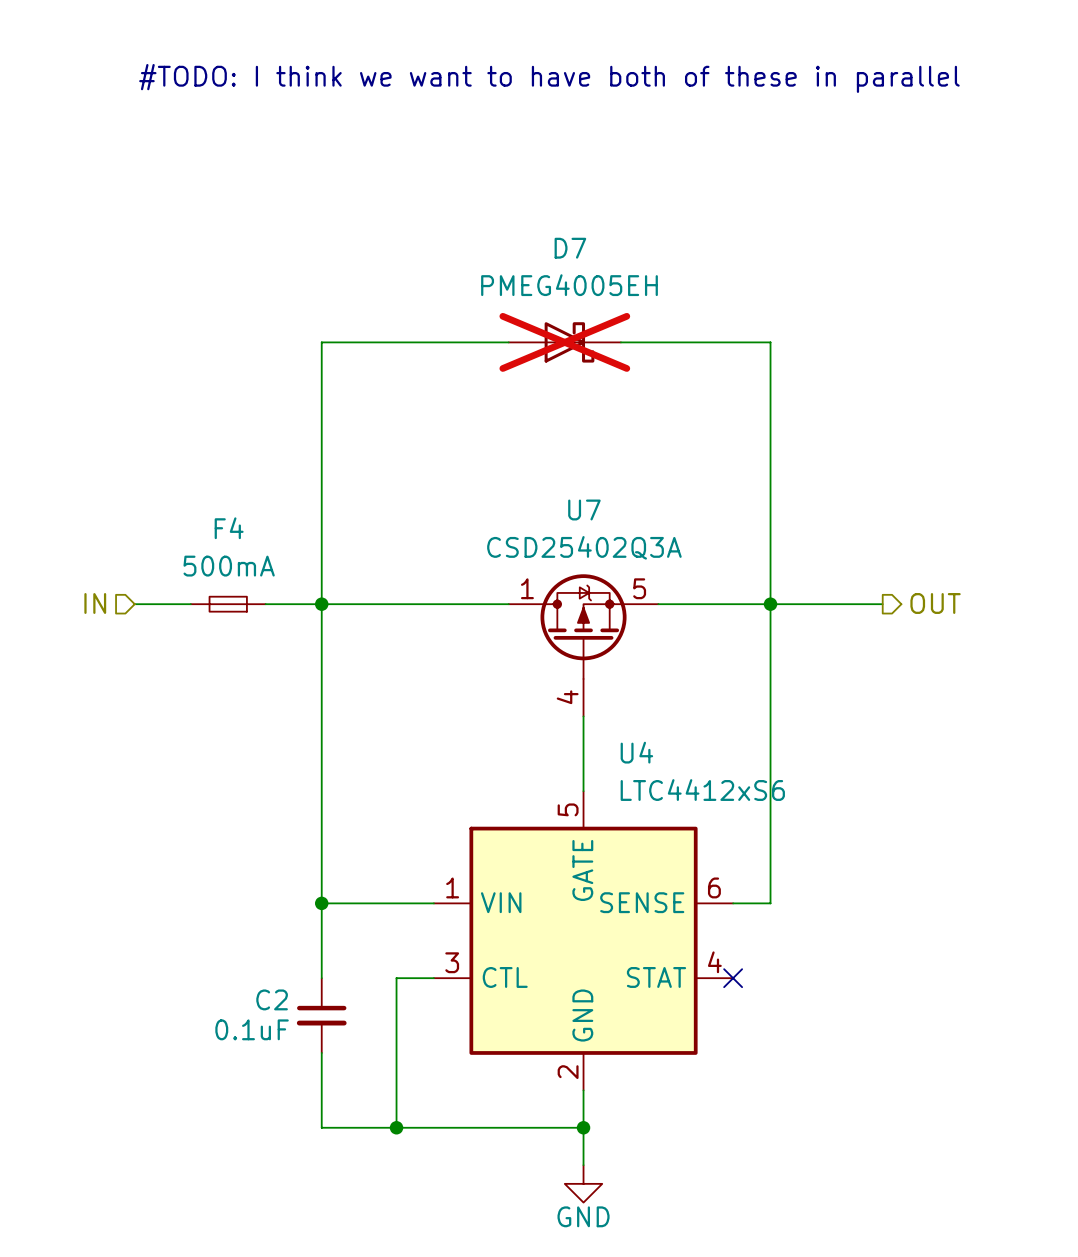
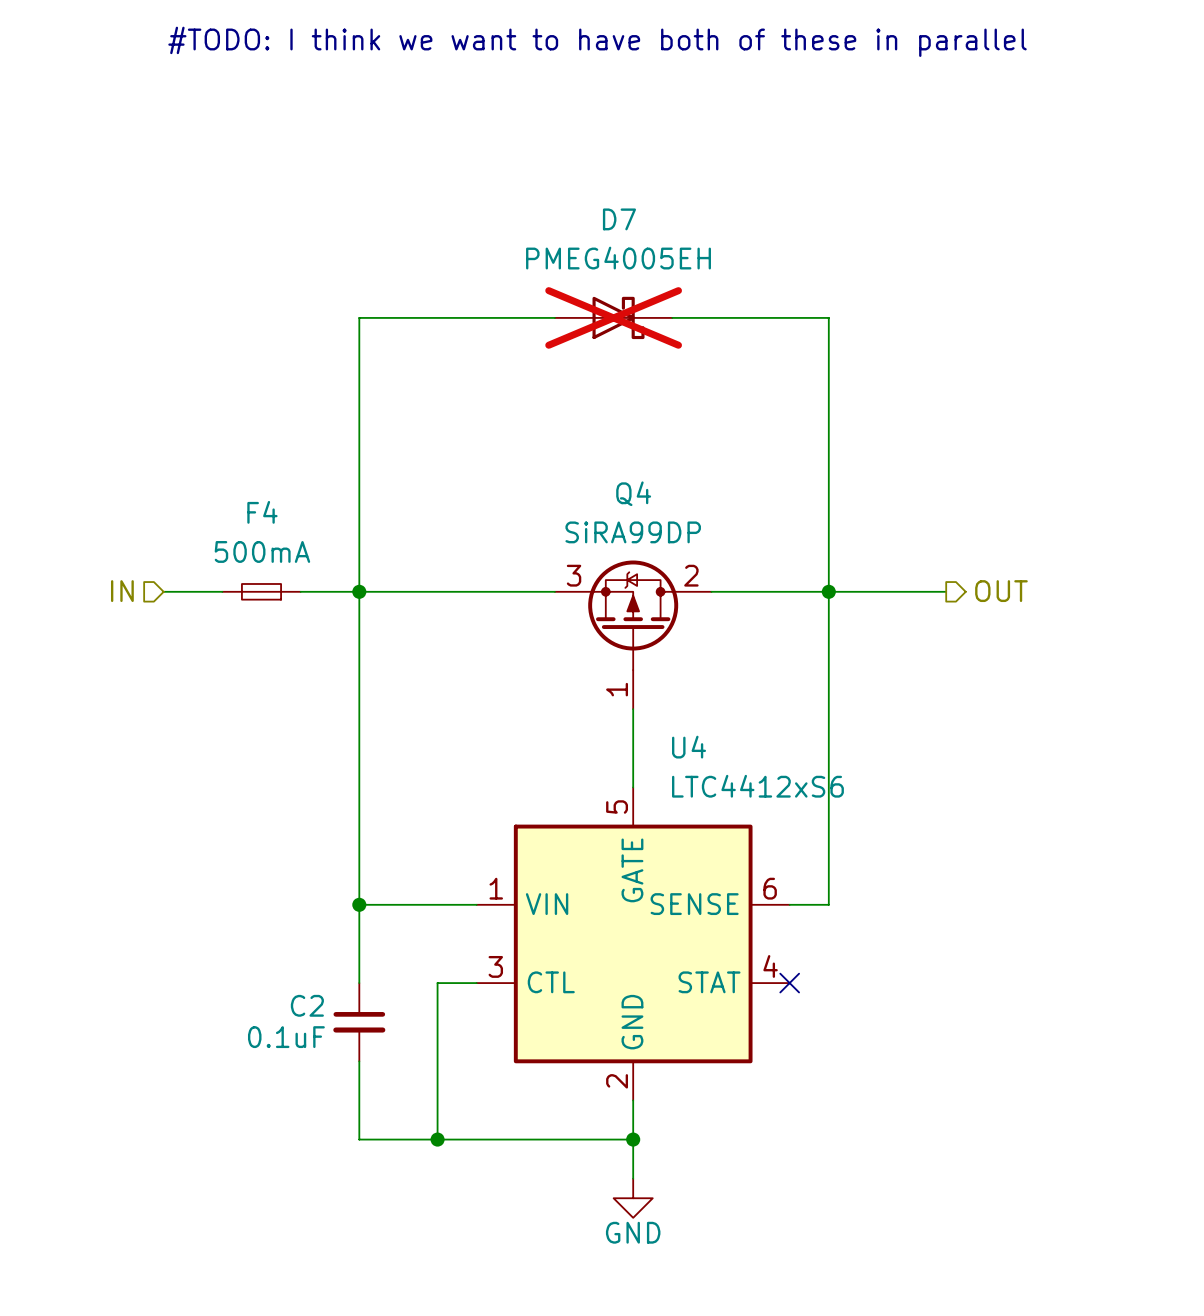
U7: CSD25402Q3A (583, 645) -> none
Q4: none -> SiRA99DP (633, 634)

